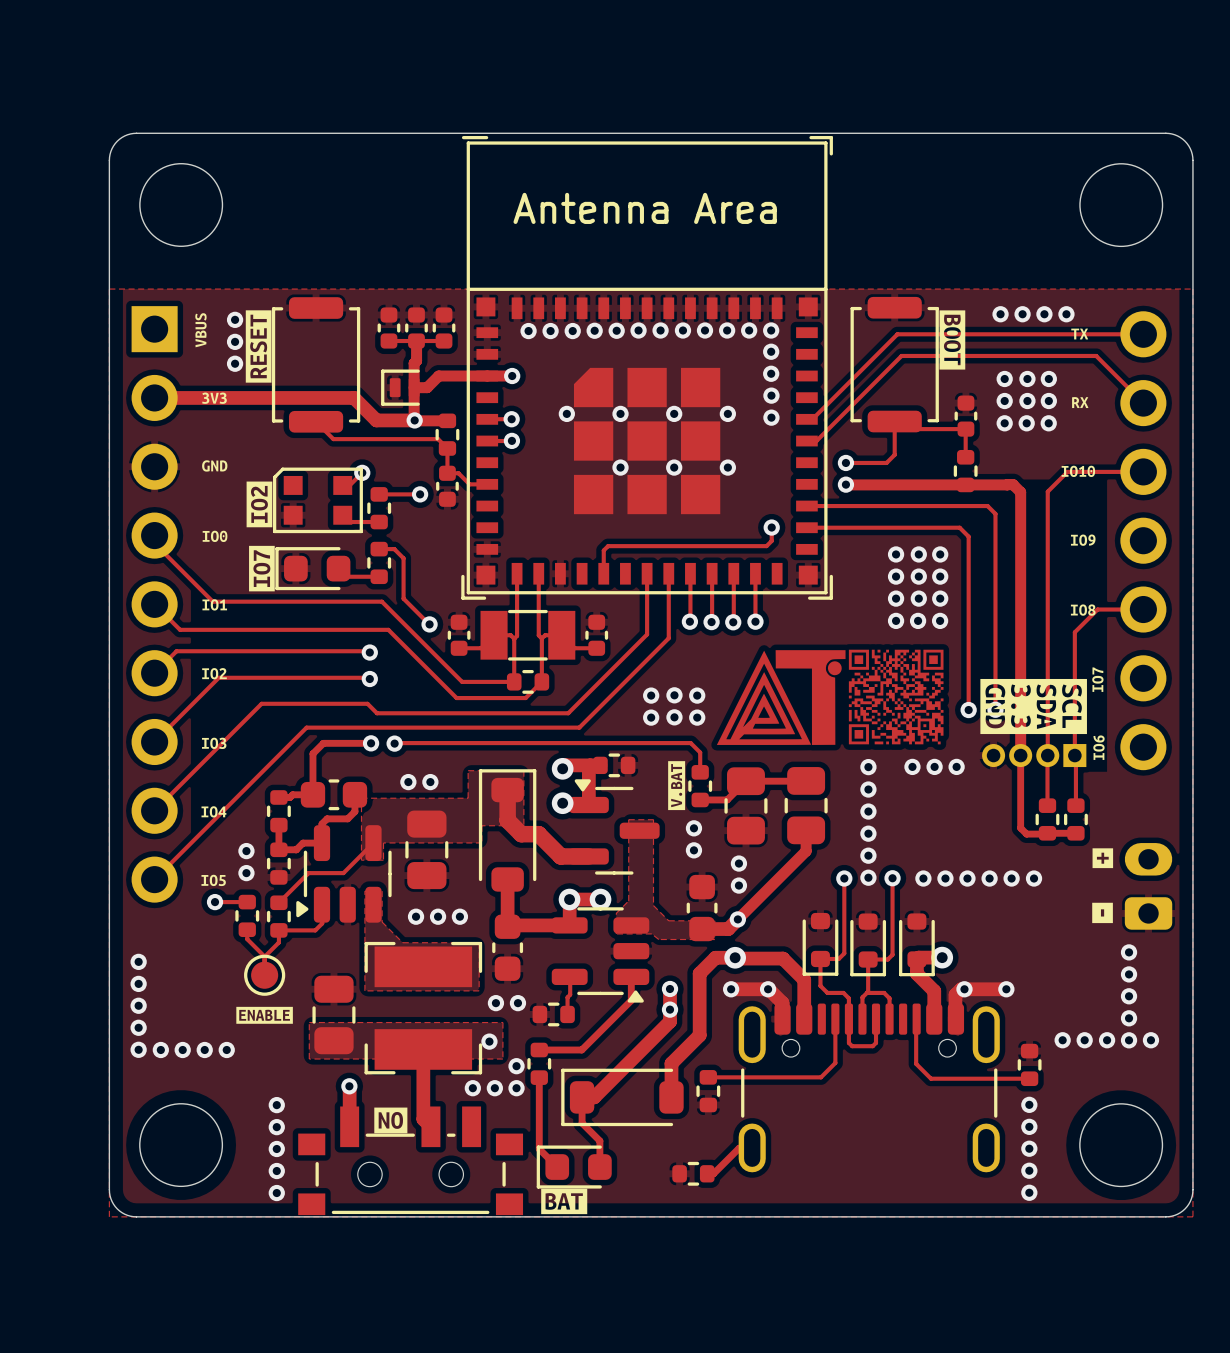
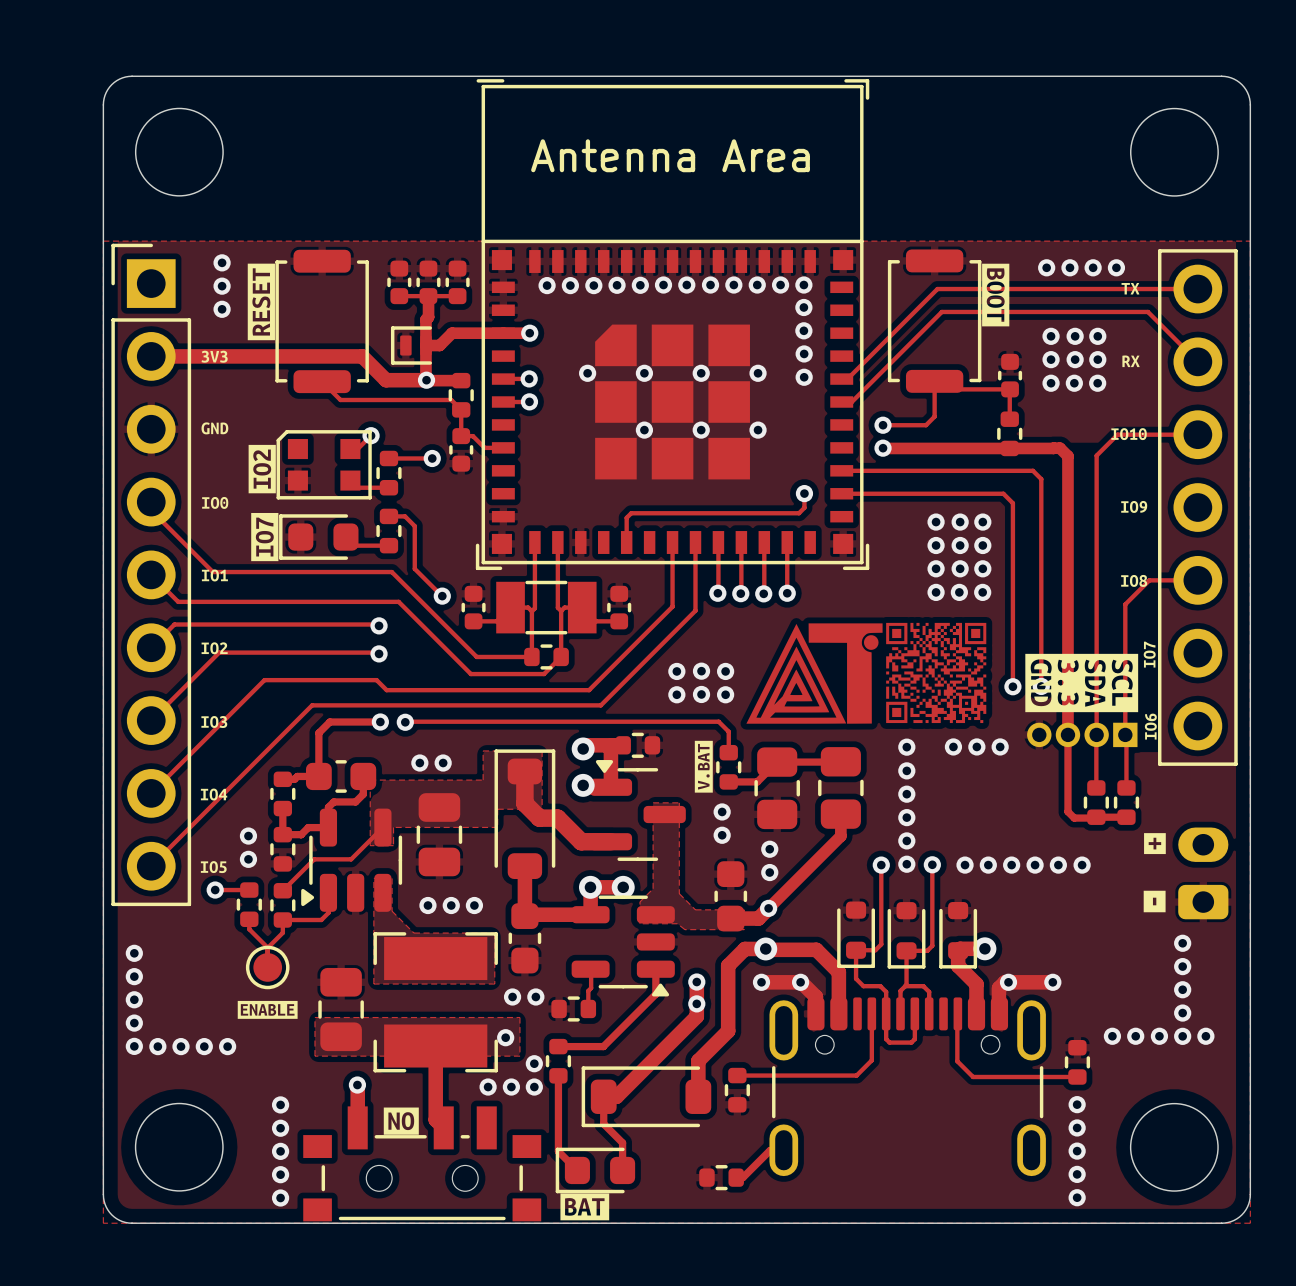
part footprint: [108, 132, 1194, 1218] -> [102, 75, 1252, 1224]
via: none -> (222, 262)
drawing: [195, 313, 207, 348] -> none
via: (235, 319) -> none
via: none -> (222, 286)
via: (235, 341) -> none
via: none -> (222, 309)
via: (235, 363) -> none

